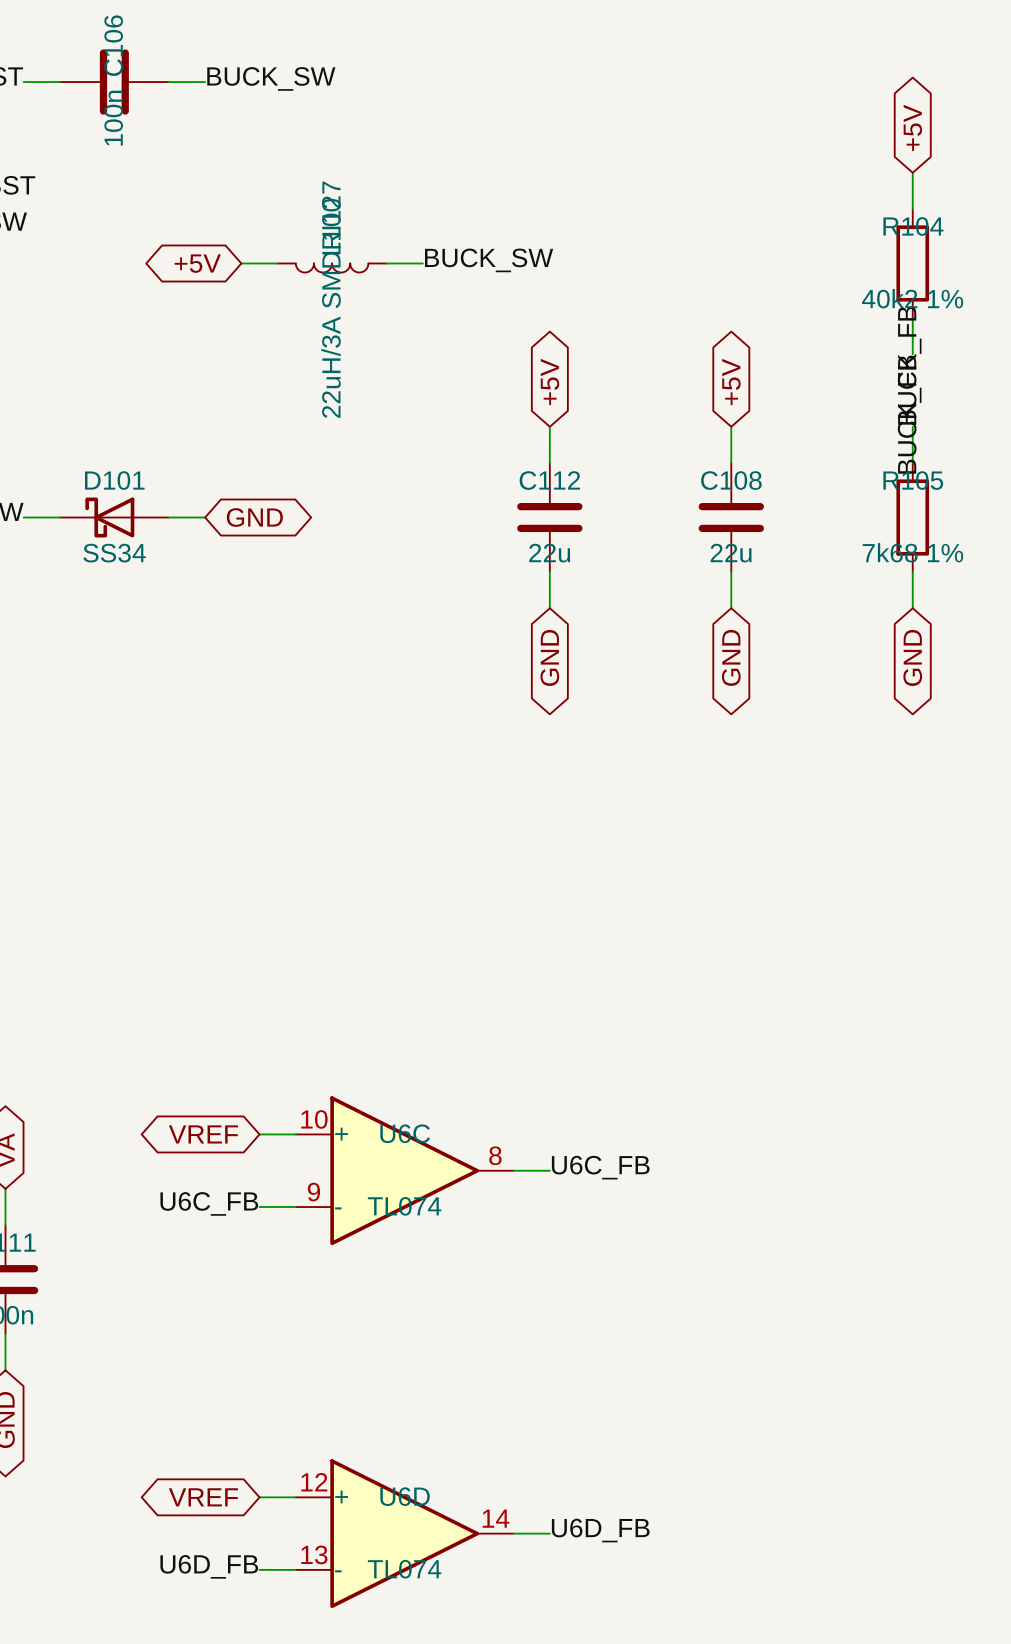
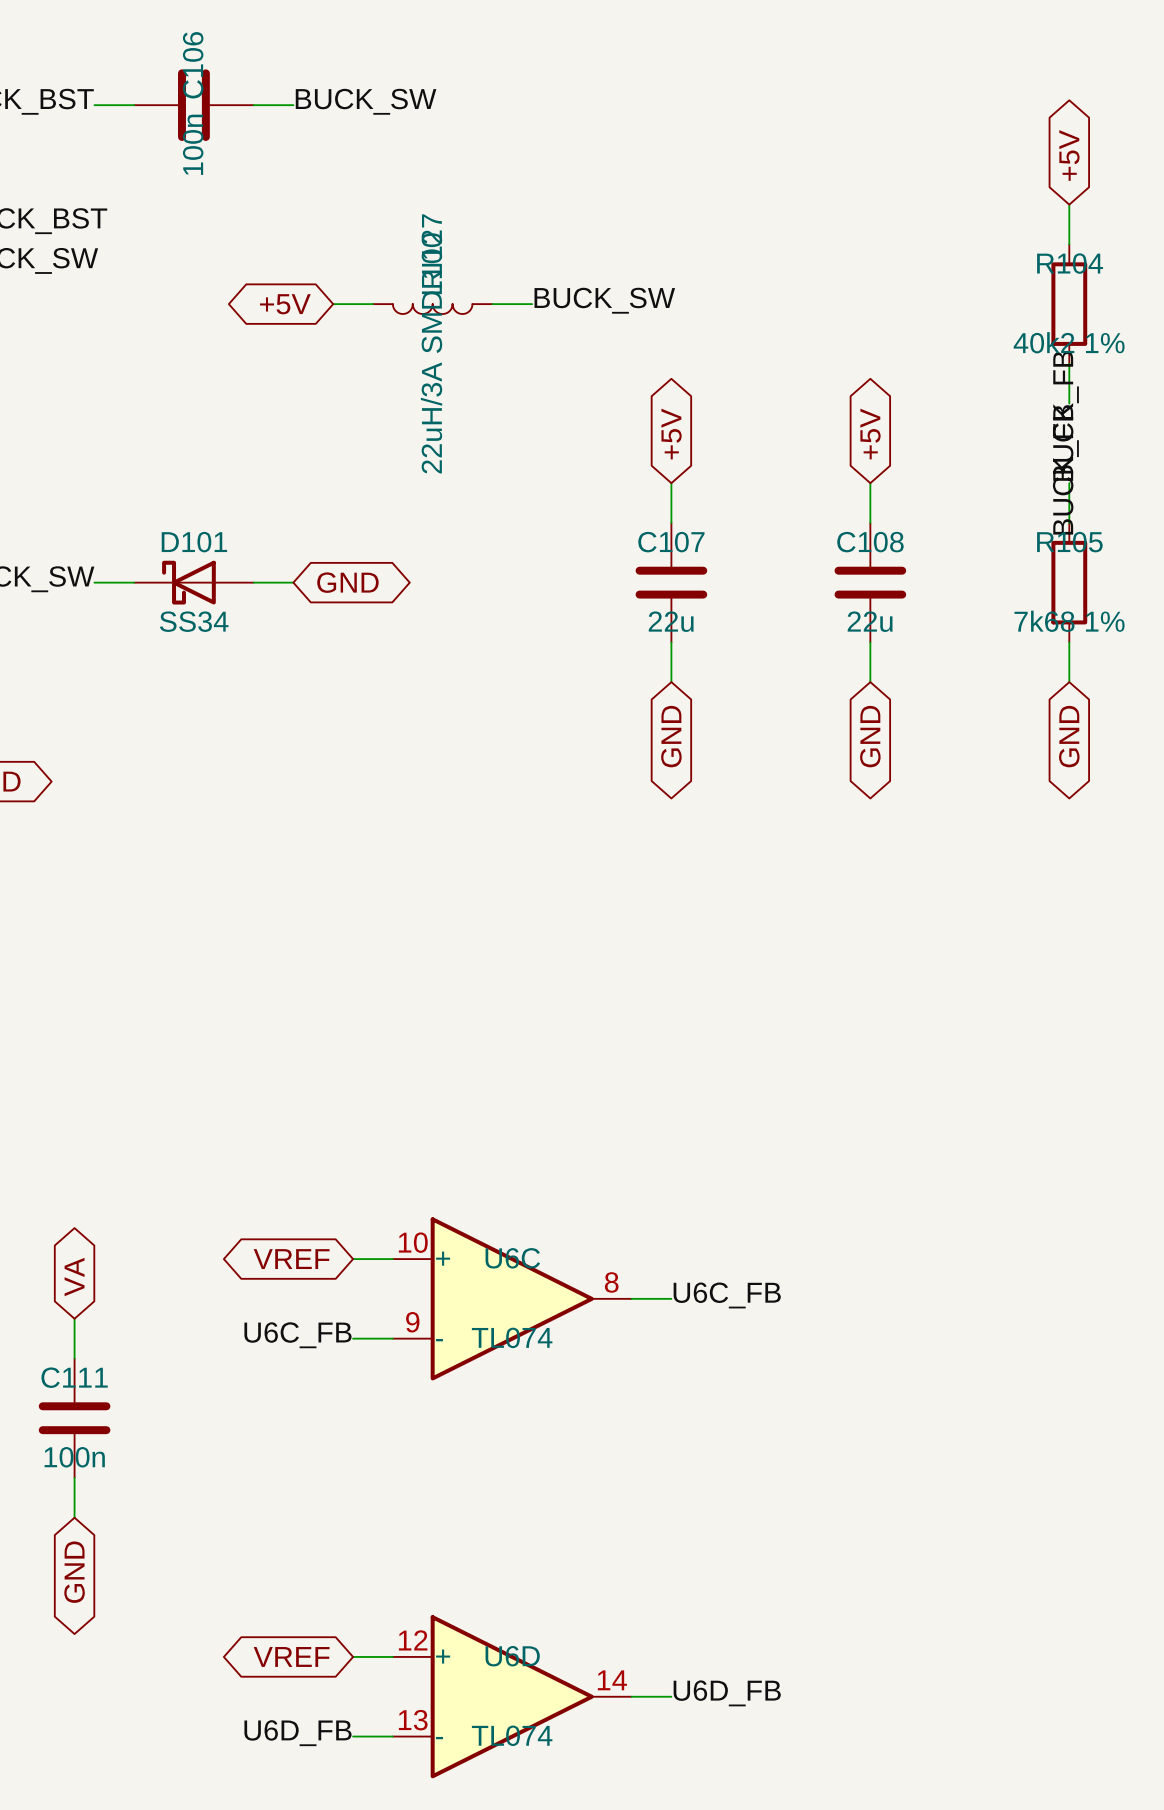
C112 name: C112 (549, 480) -> C107 (671, 542)

